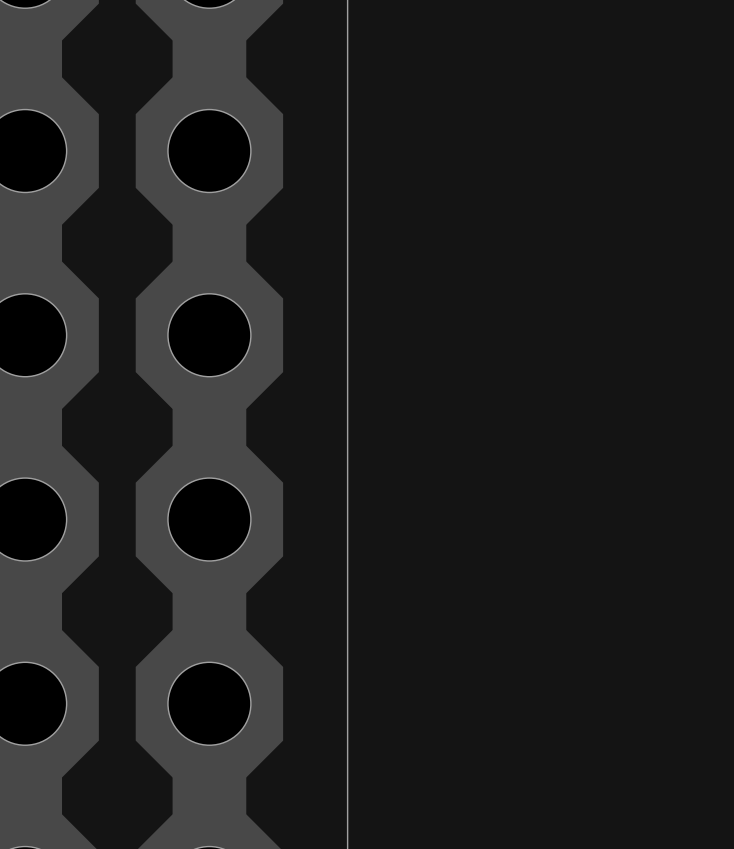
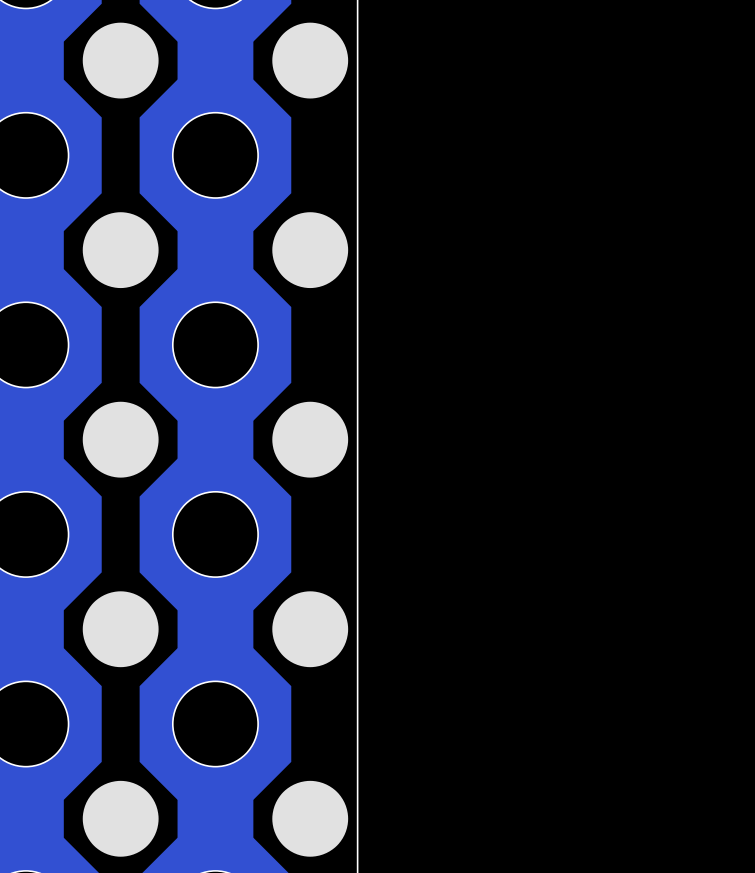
drawing: none -> [82, 22, 159, 99]
drawing: none -> [272, 22, 349, 99]
drawing: none -> [82, 212, 159, 289]
drawing: none -> [272, 212, 349, 289]
drawing: none -> [82, 401, 159, 478]
drawing: none -> [272, 401, 349, 478]
drawing: none -> [82, 591, 159, 668]
drawing: none -> [272, 591, 349, 668]
drawing: none -> [82, 780, 159, 857]
drawing: none -> [272, 780, 349, 857]

